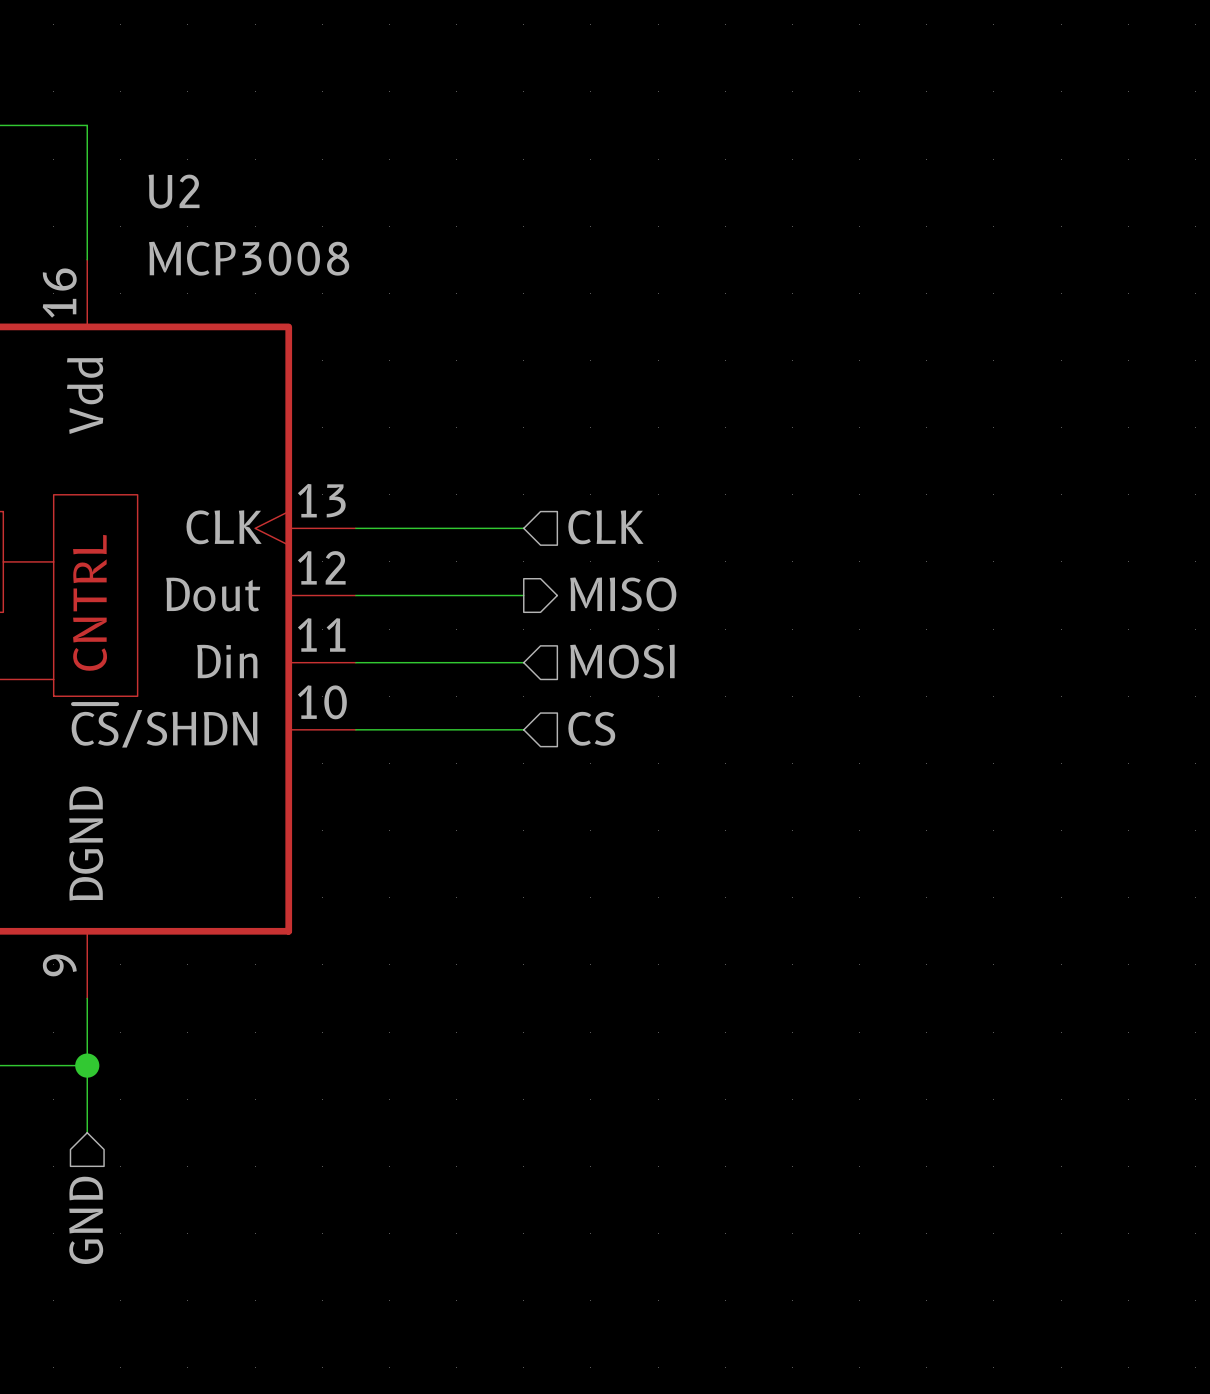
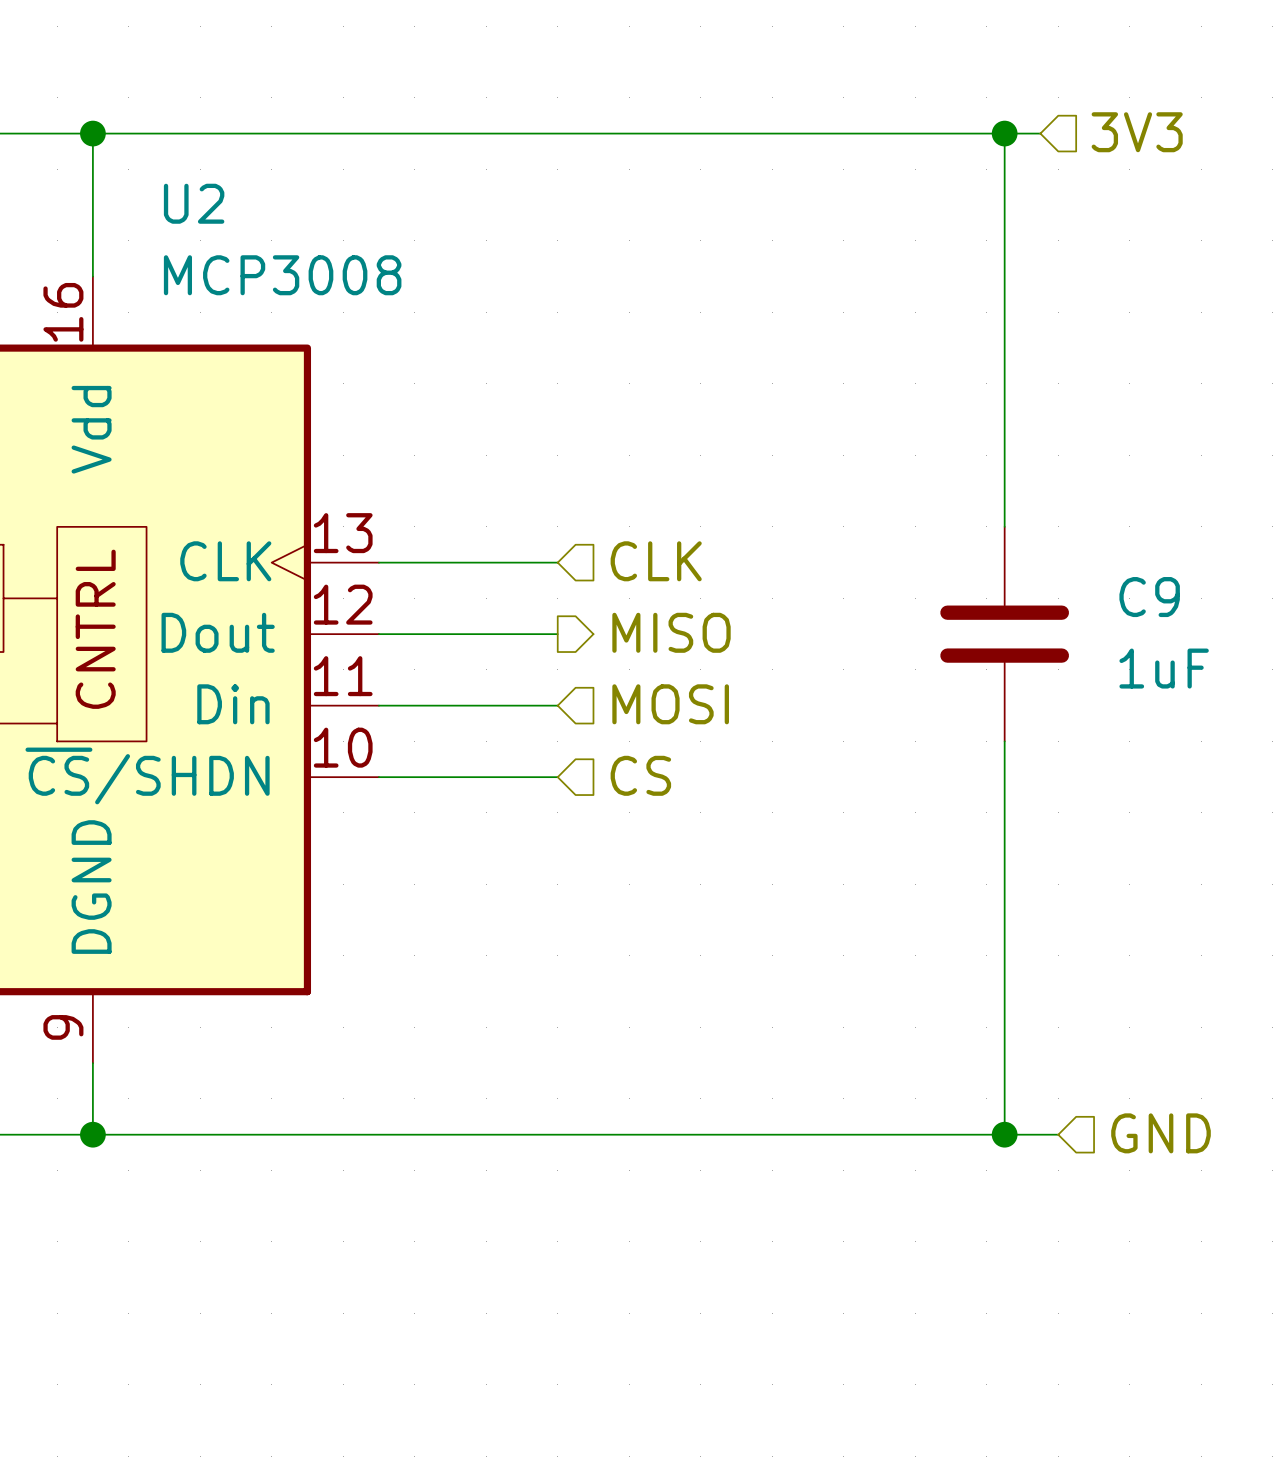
hierarchical label: none -> 3V3 (1137, 132)
wire: none -> (92, 133) (1040, 133)
junction: none -> (92, 133)
wire: none -> (1004, 133) (1004, 526)
junction: none -> (1004, 133)
C9: none -> 1uF (1004, 634)
wire: none -> (1004, 741) (1004, 1134)
hierarchical label: none -> GND (1161, 1133)
wire: (87, 1065) (87, 1132) -> (92, 1134) (1058, 1134)
junction: none -> (1004, 1134)
hierarchical label: GND (86, 1220) -> none

